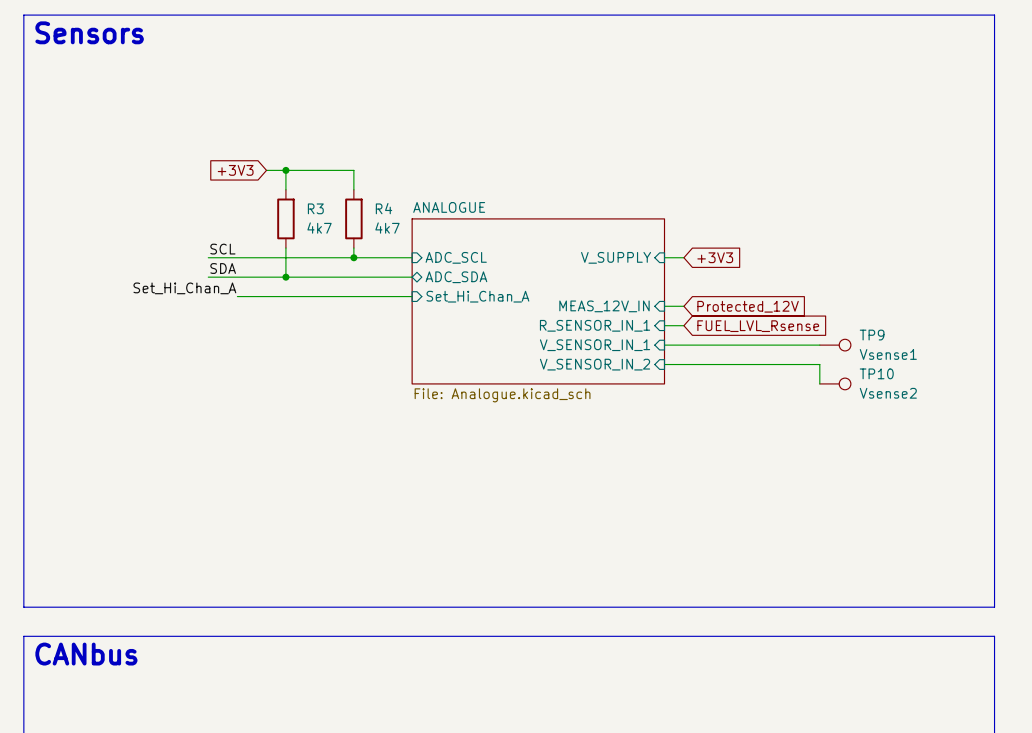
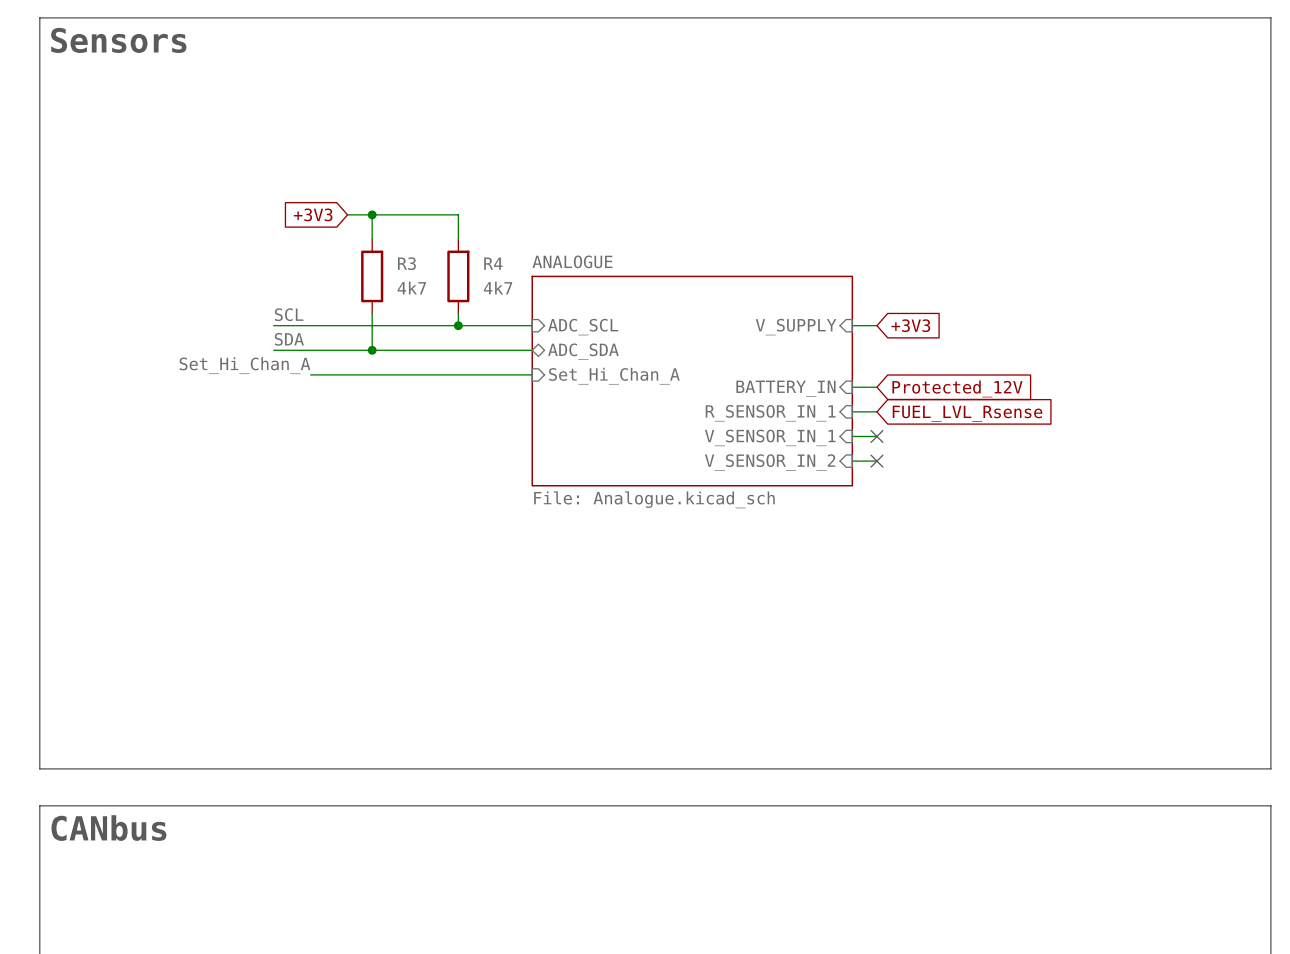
sheet pin: MEAS_12V_IN (604, 306) -> BATTERY_IN (785, 388)
wire: (683, 345) (819, 345) -> none
no-connect mark: none -> (876, 436)
TP9: Vsense1 (835, 345) -> none
wire: (683, 364) (819, 364) (819, 383) -> none
no-connect mark: none -> (876, 461)
TP10: Vsense2 (835, 383) -> none

